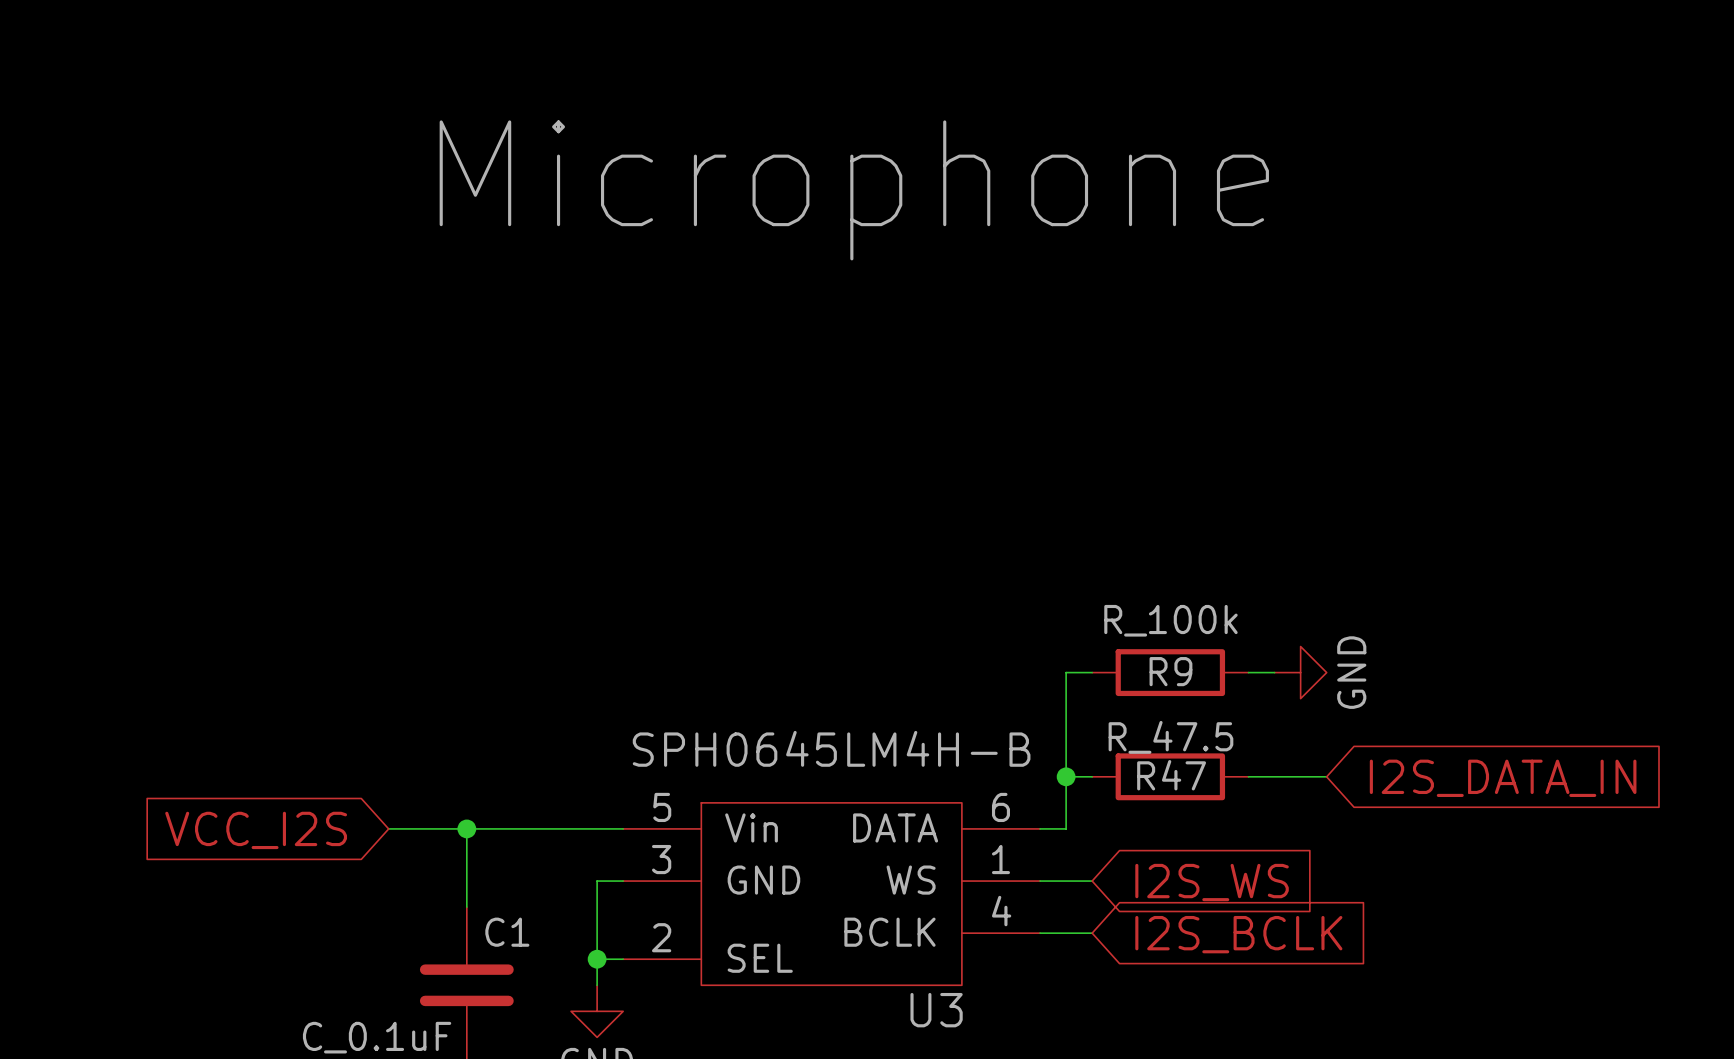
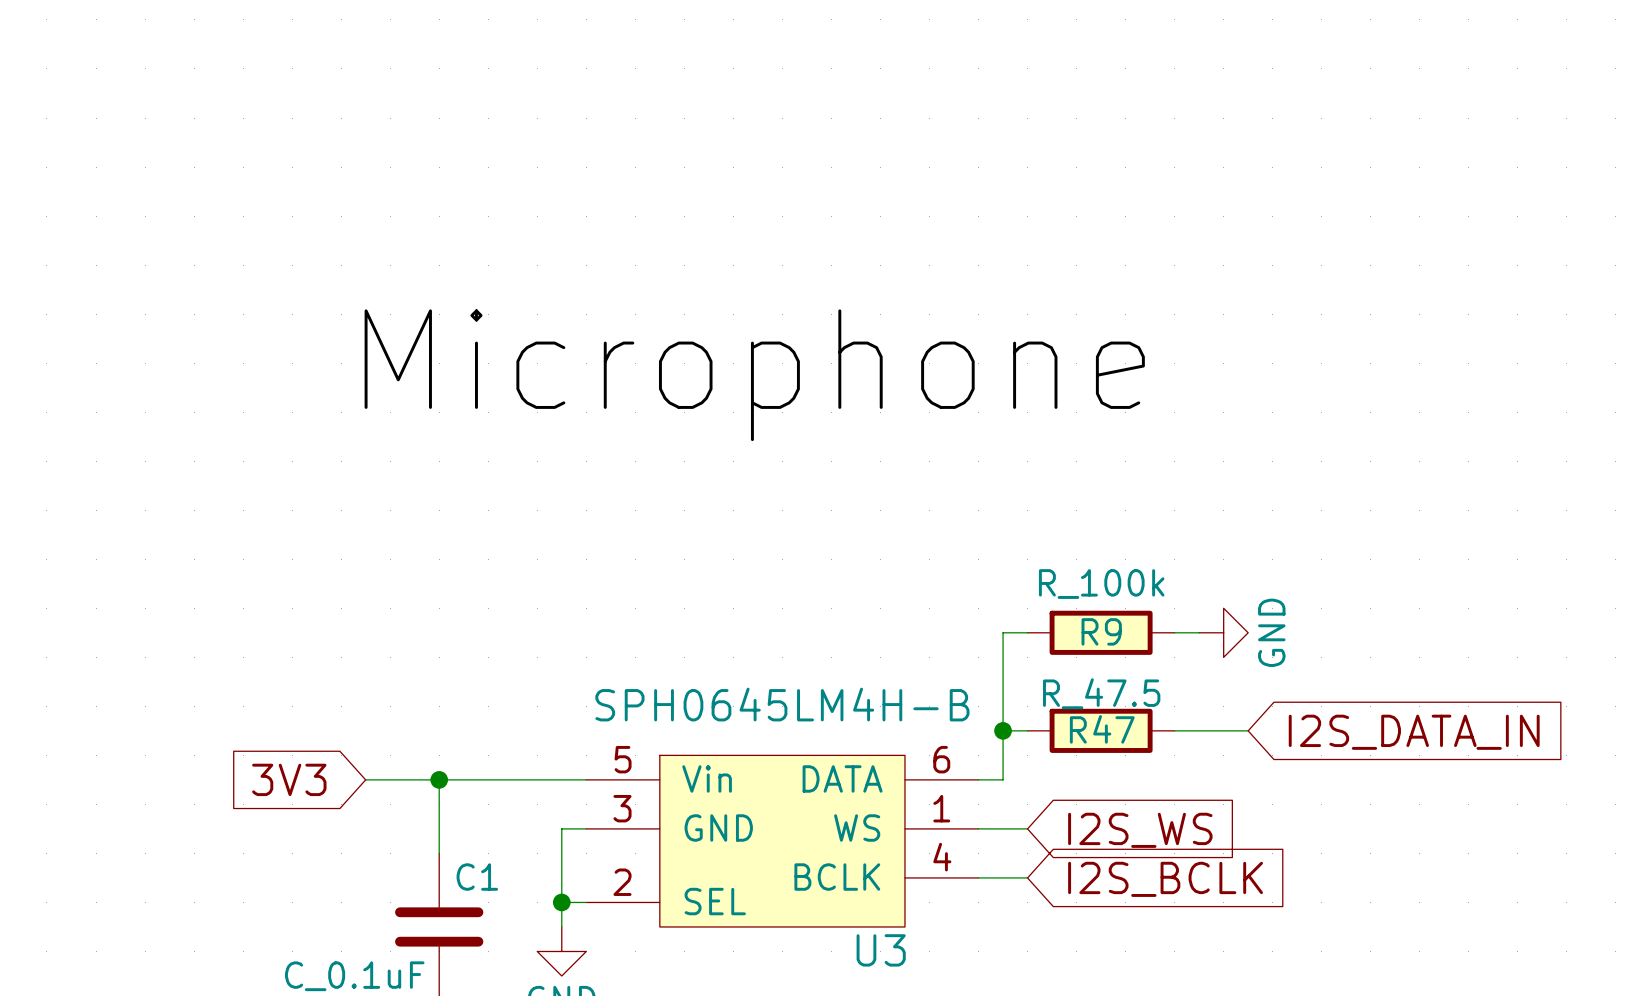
label position: Microphone (854, 190) -> Microphone (754, 375)
global label: VCC_I2S (256, 830) -> 3V3 (289, 779)

